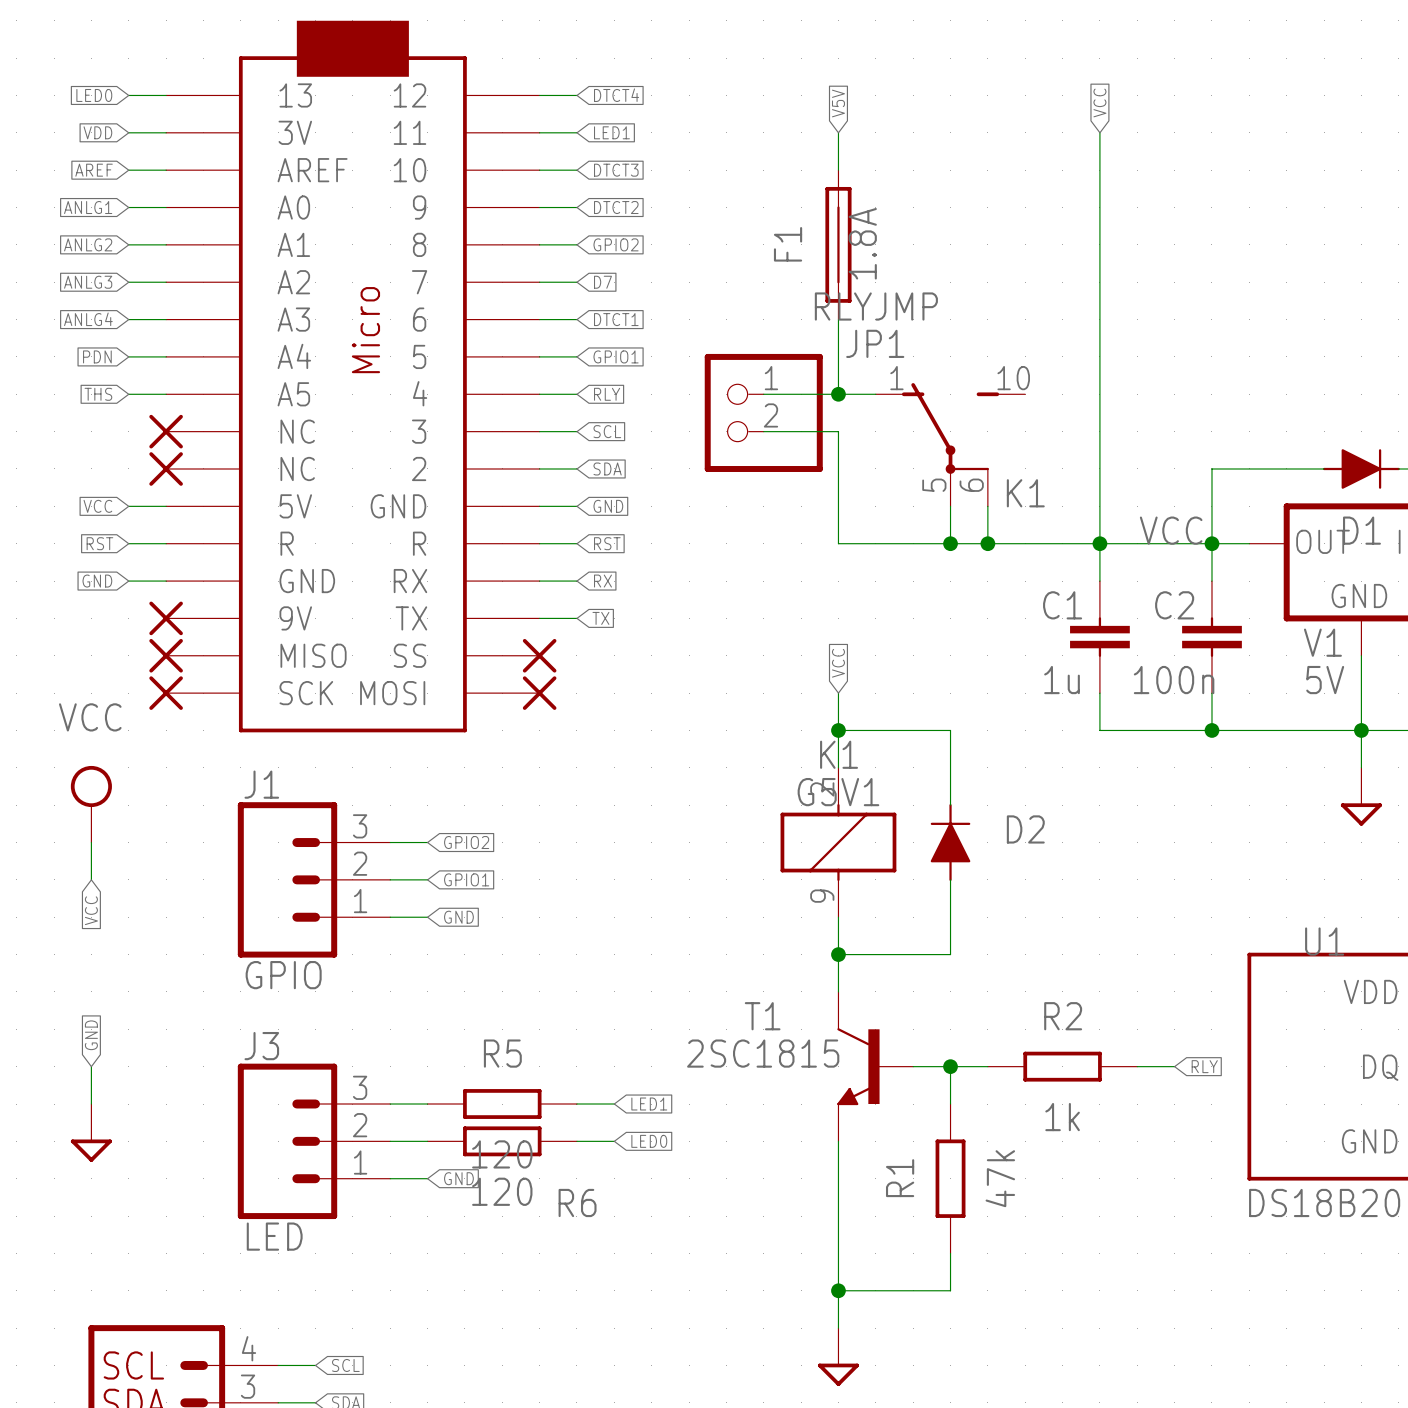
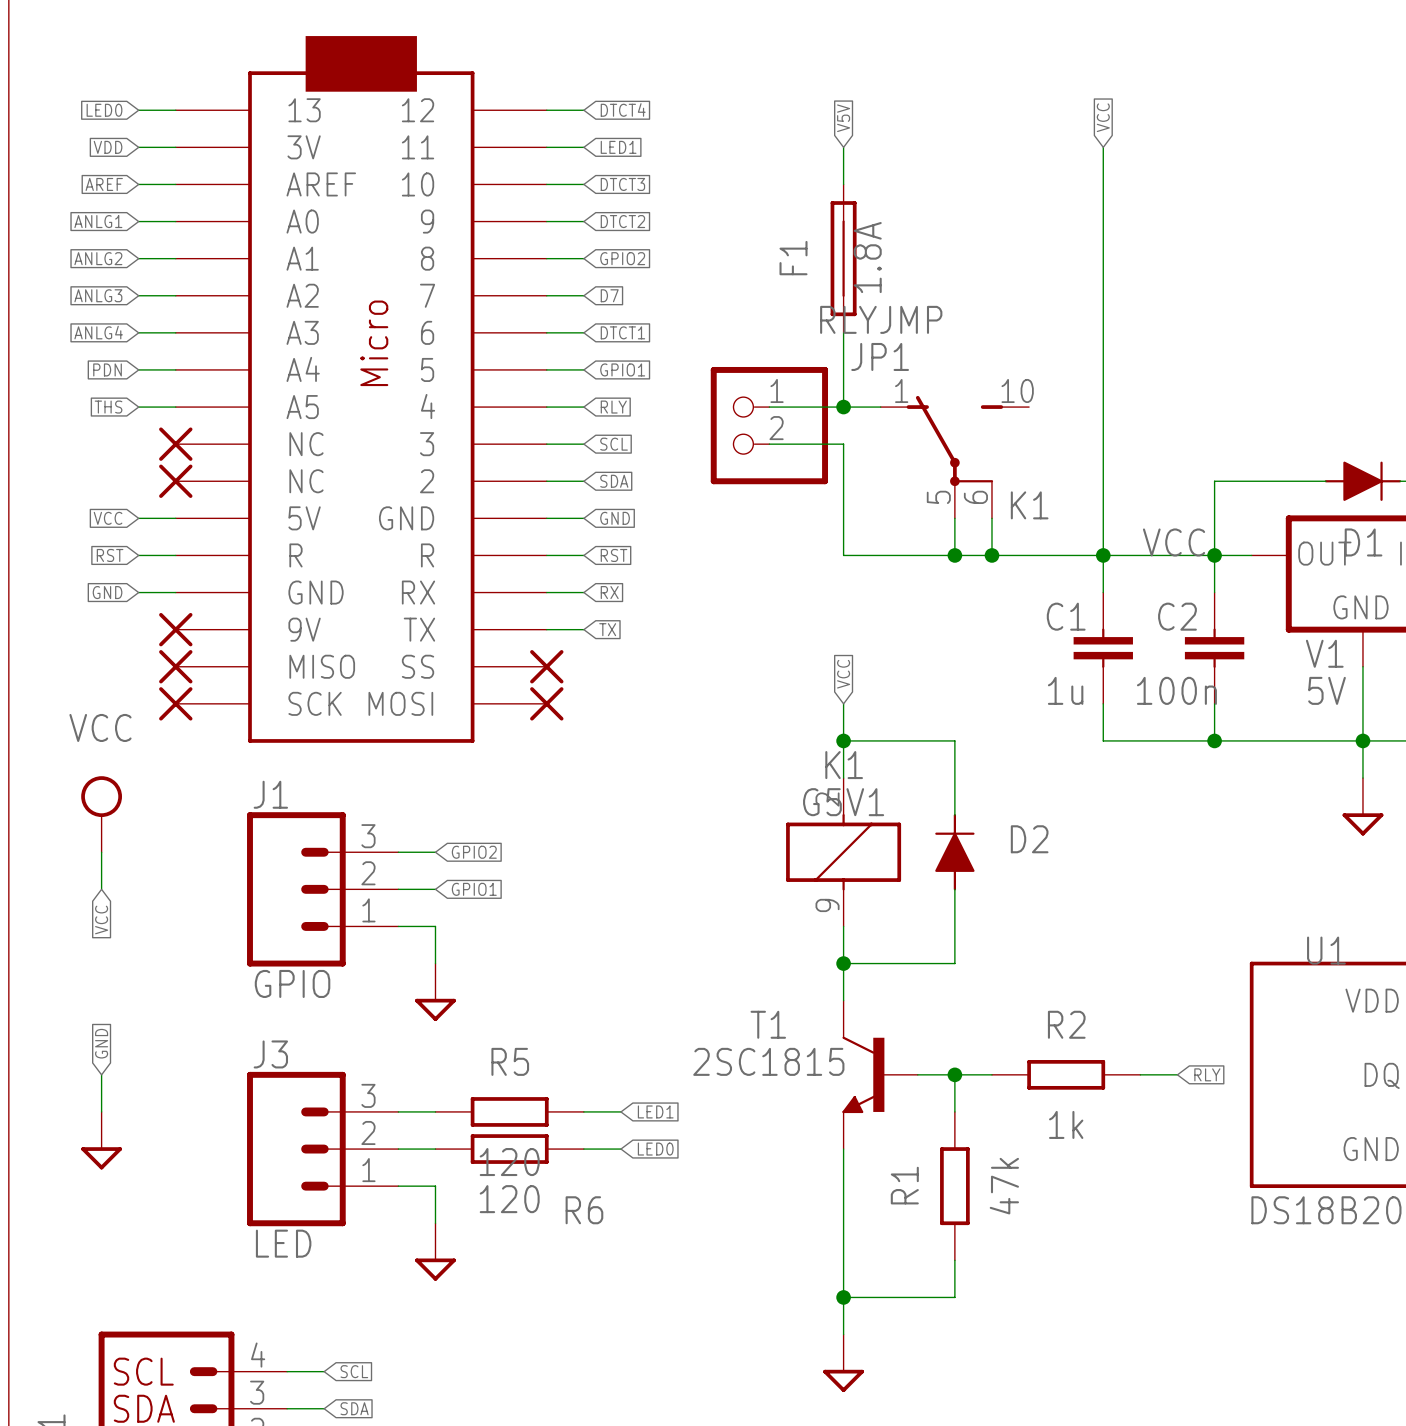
wire: none -> (435, 926) (435, 963)
global label: GND (458, 917) -> none
power symbol: none -> (435, 992)
wire: none -> (435, 1186) (435, 1223)
global label: GND (458, 1178) -> none
power symbol: none -> (435, 1252)

